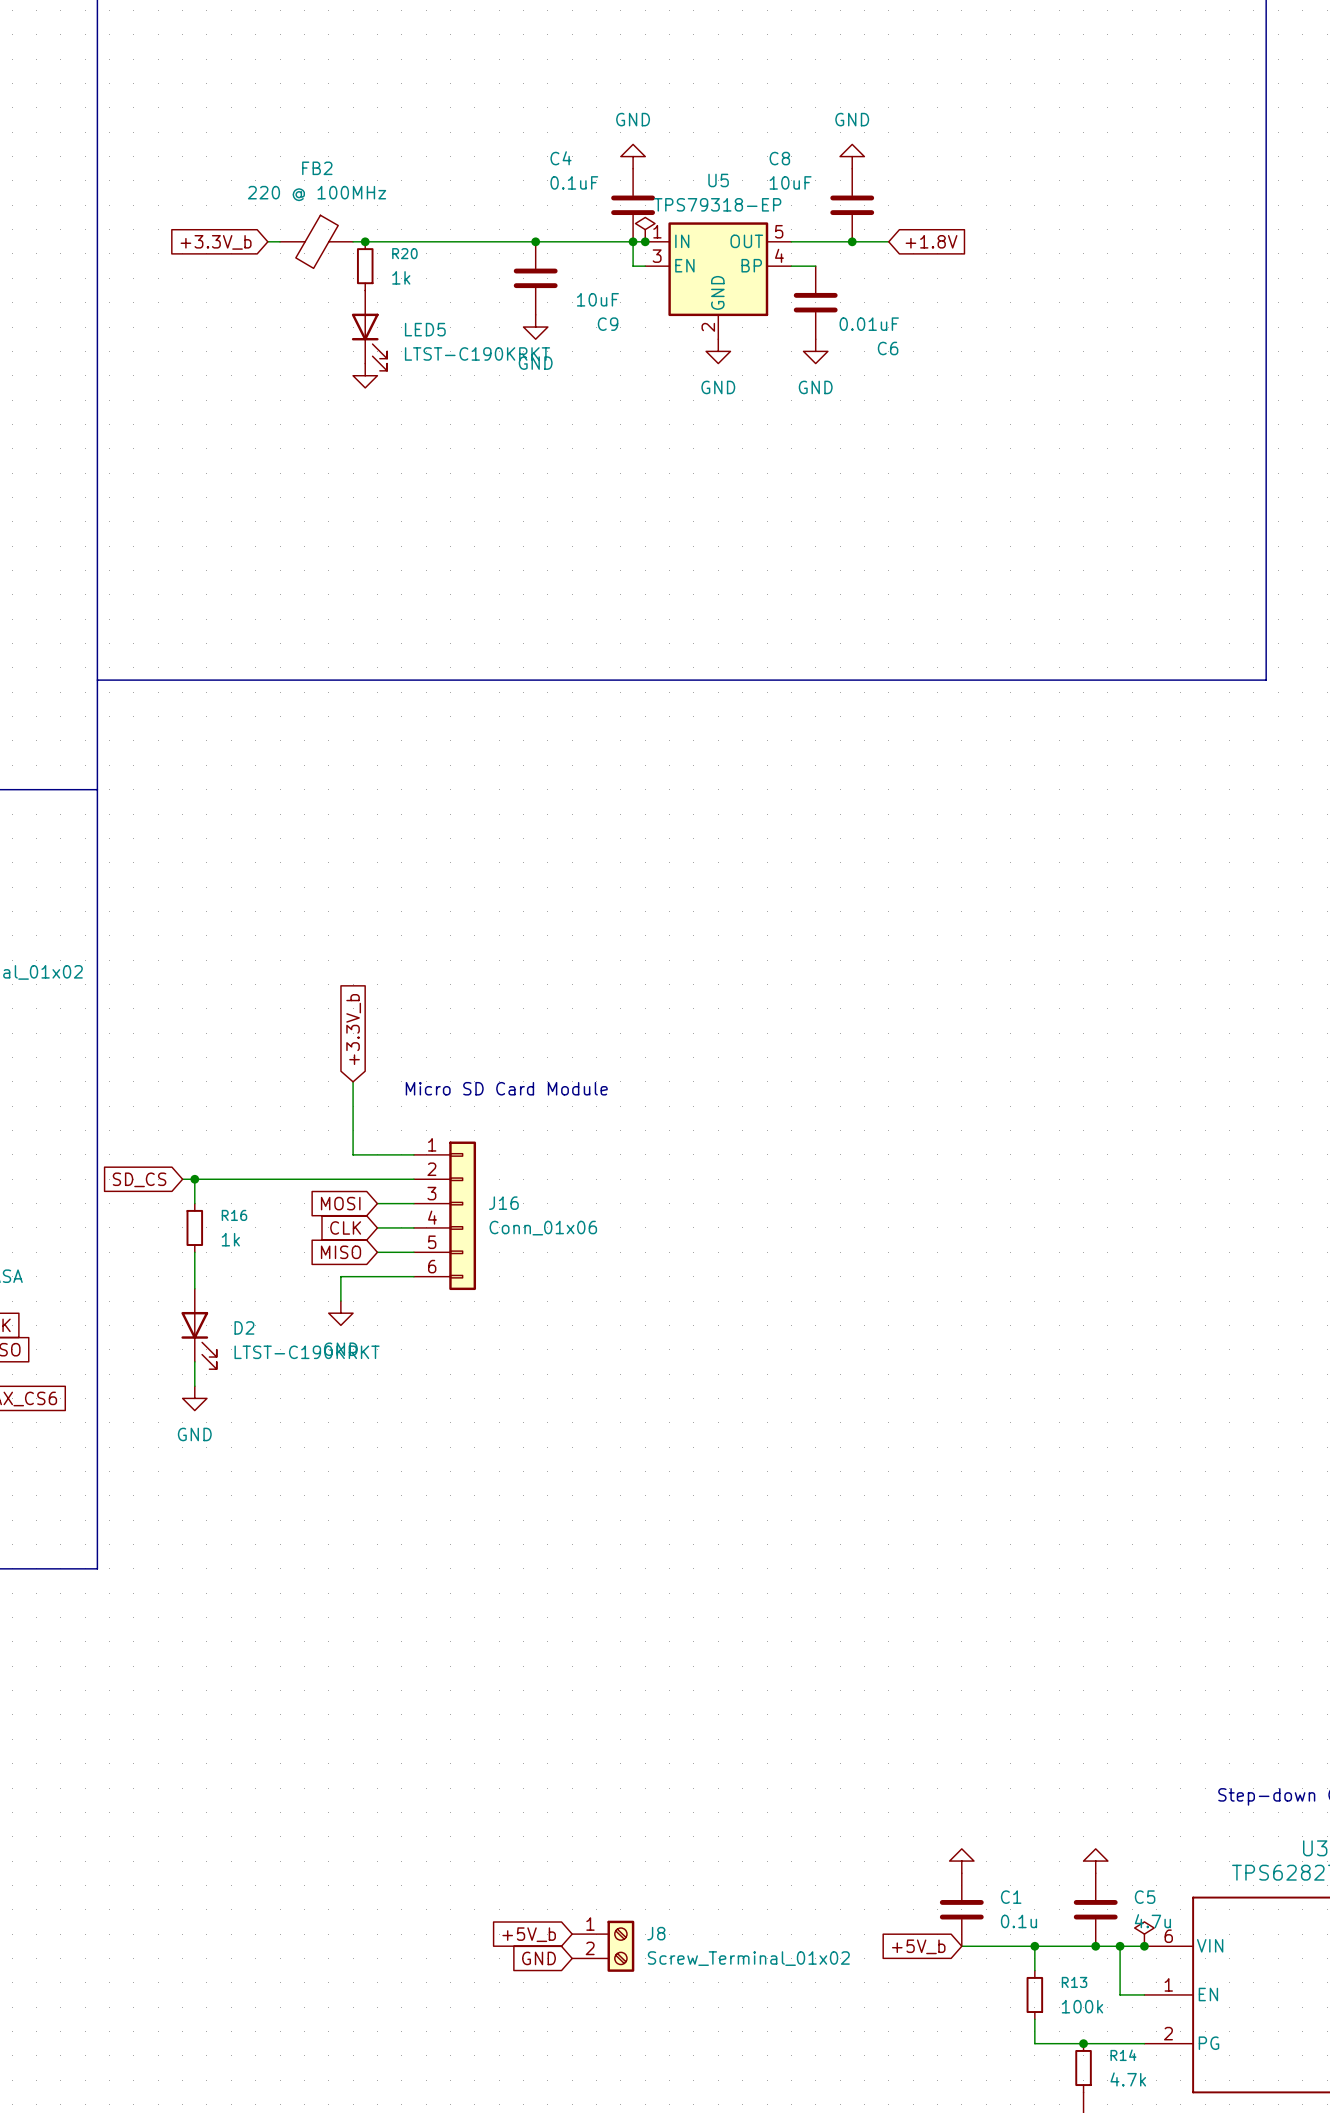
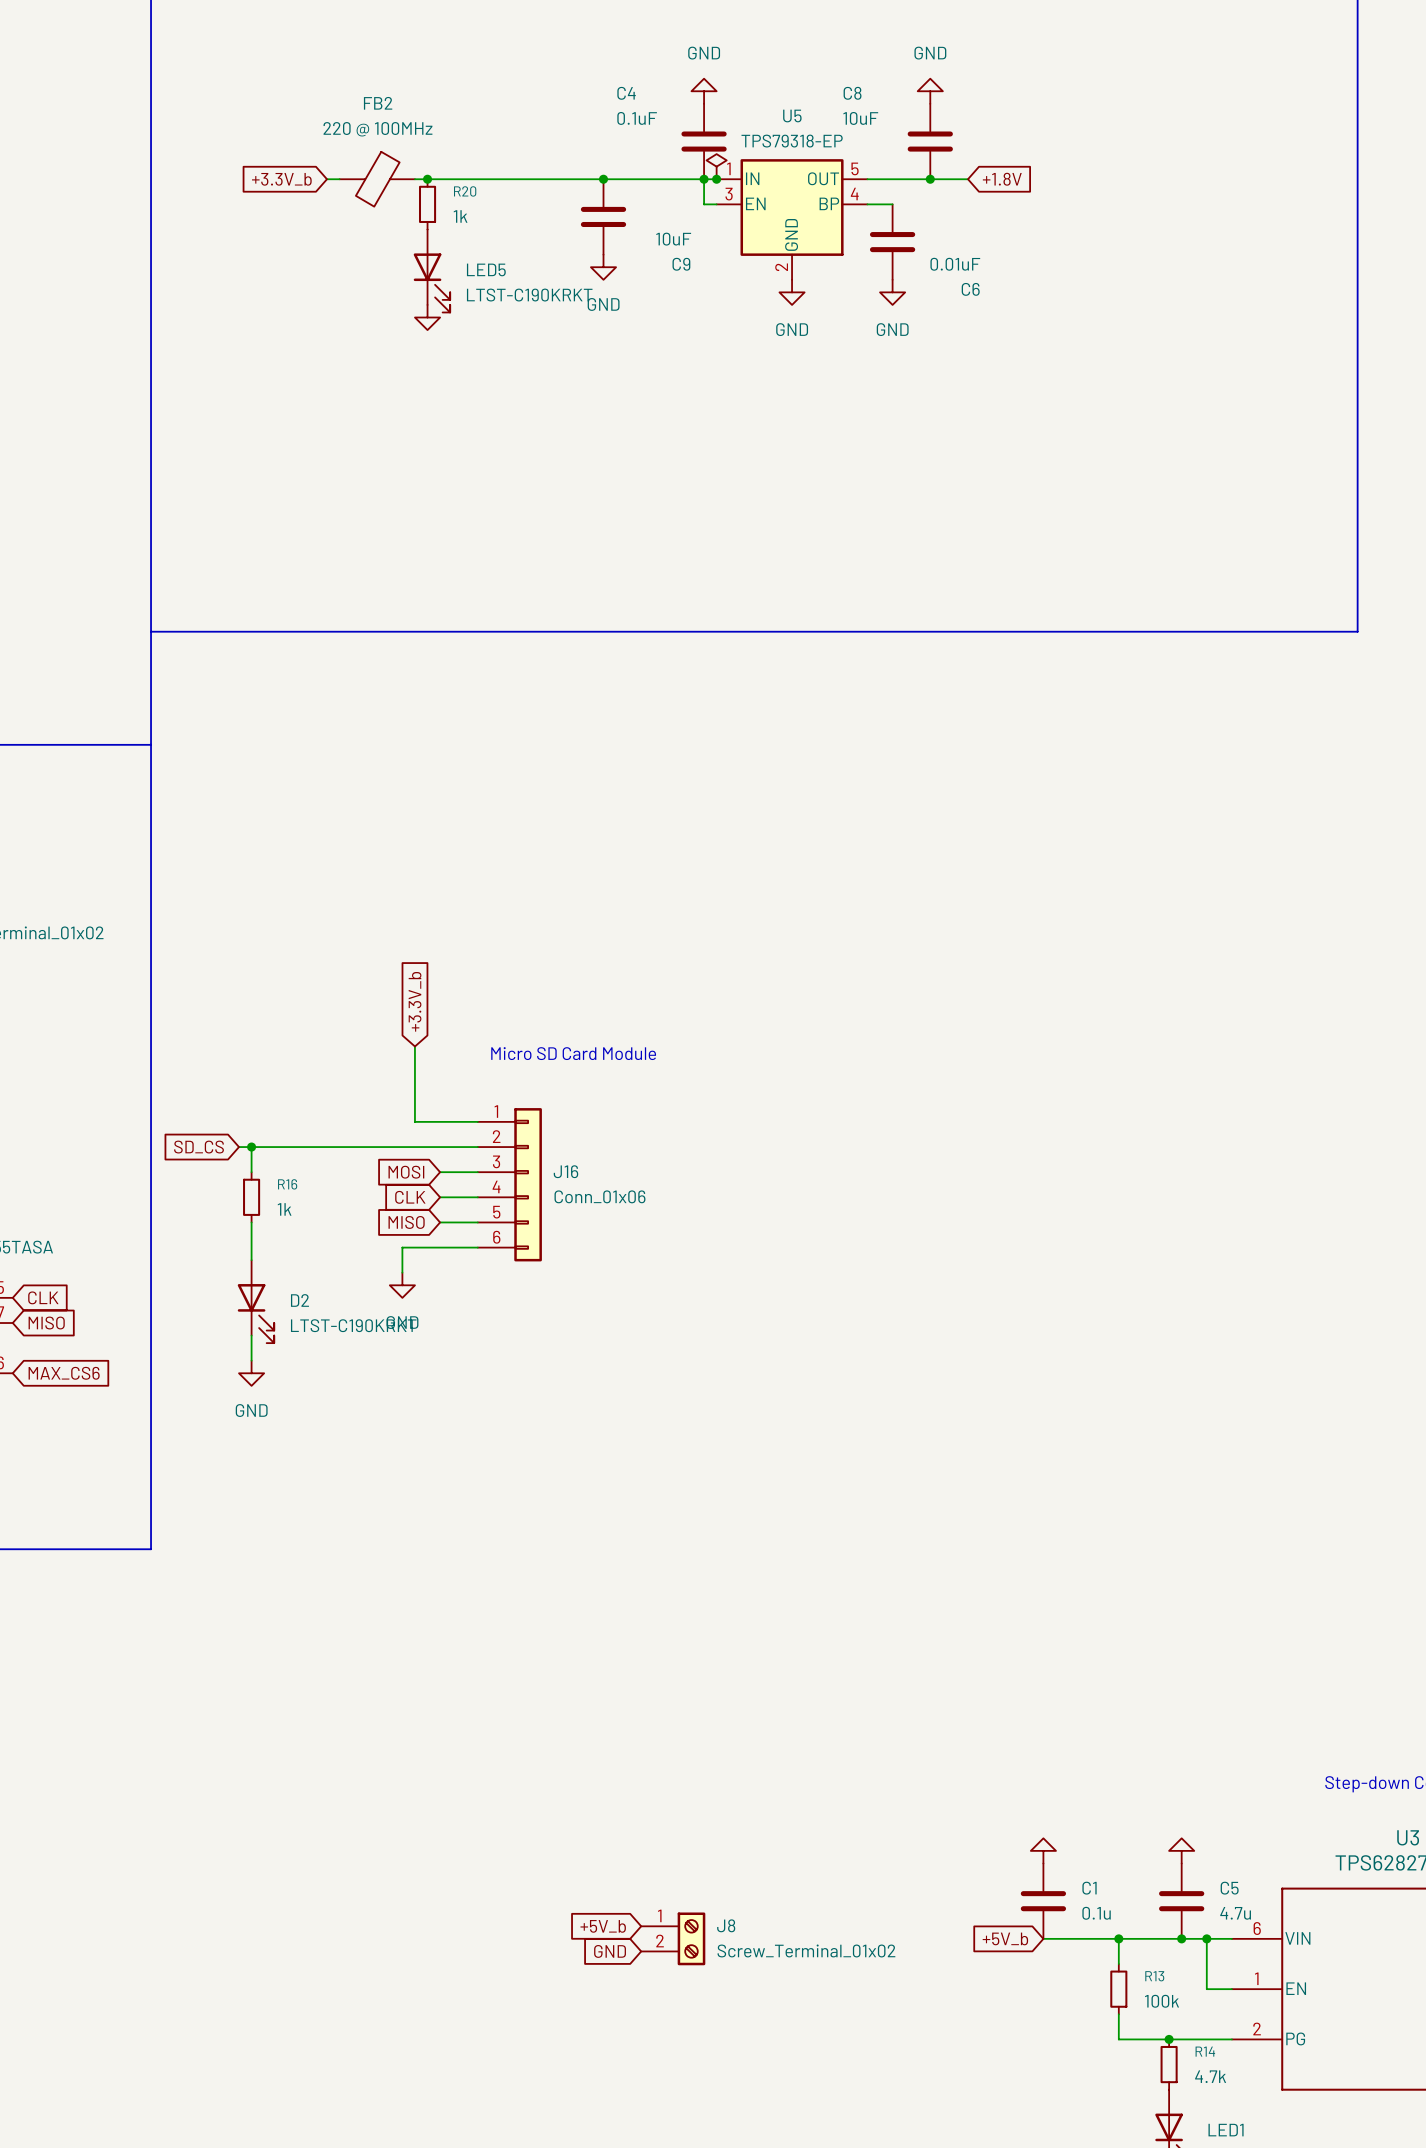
power symbol: (1144, 1934) -> none
junction: (1144, 1946) -> none

